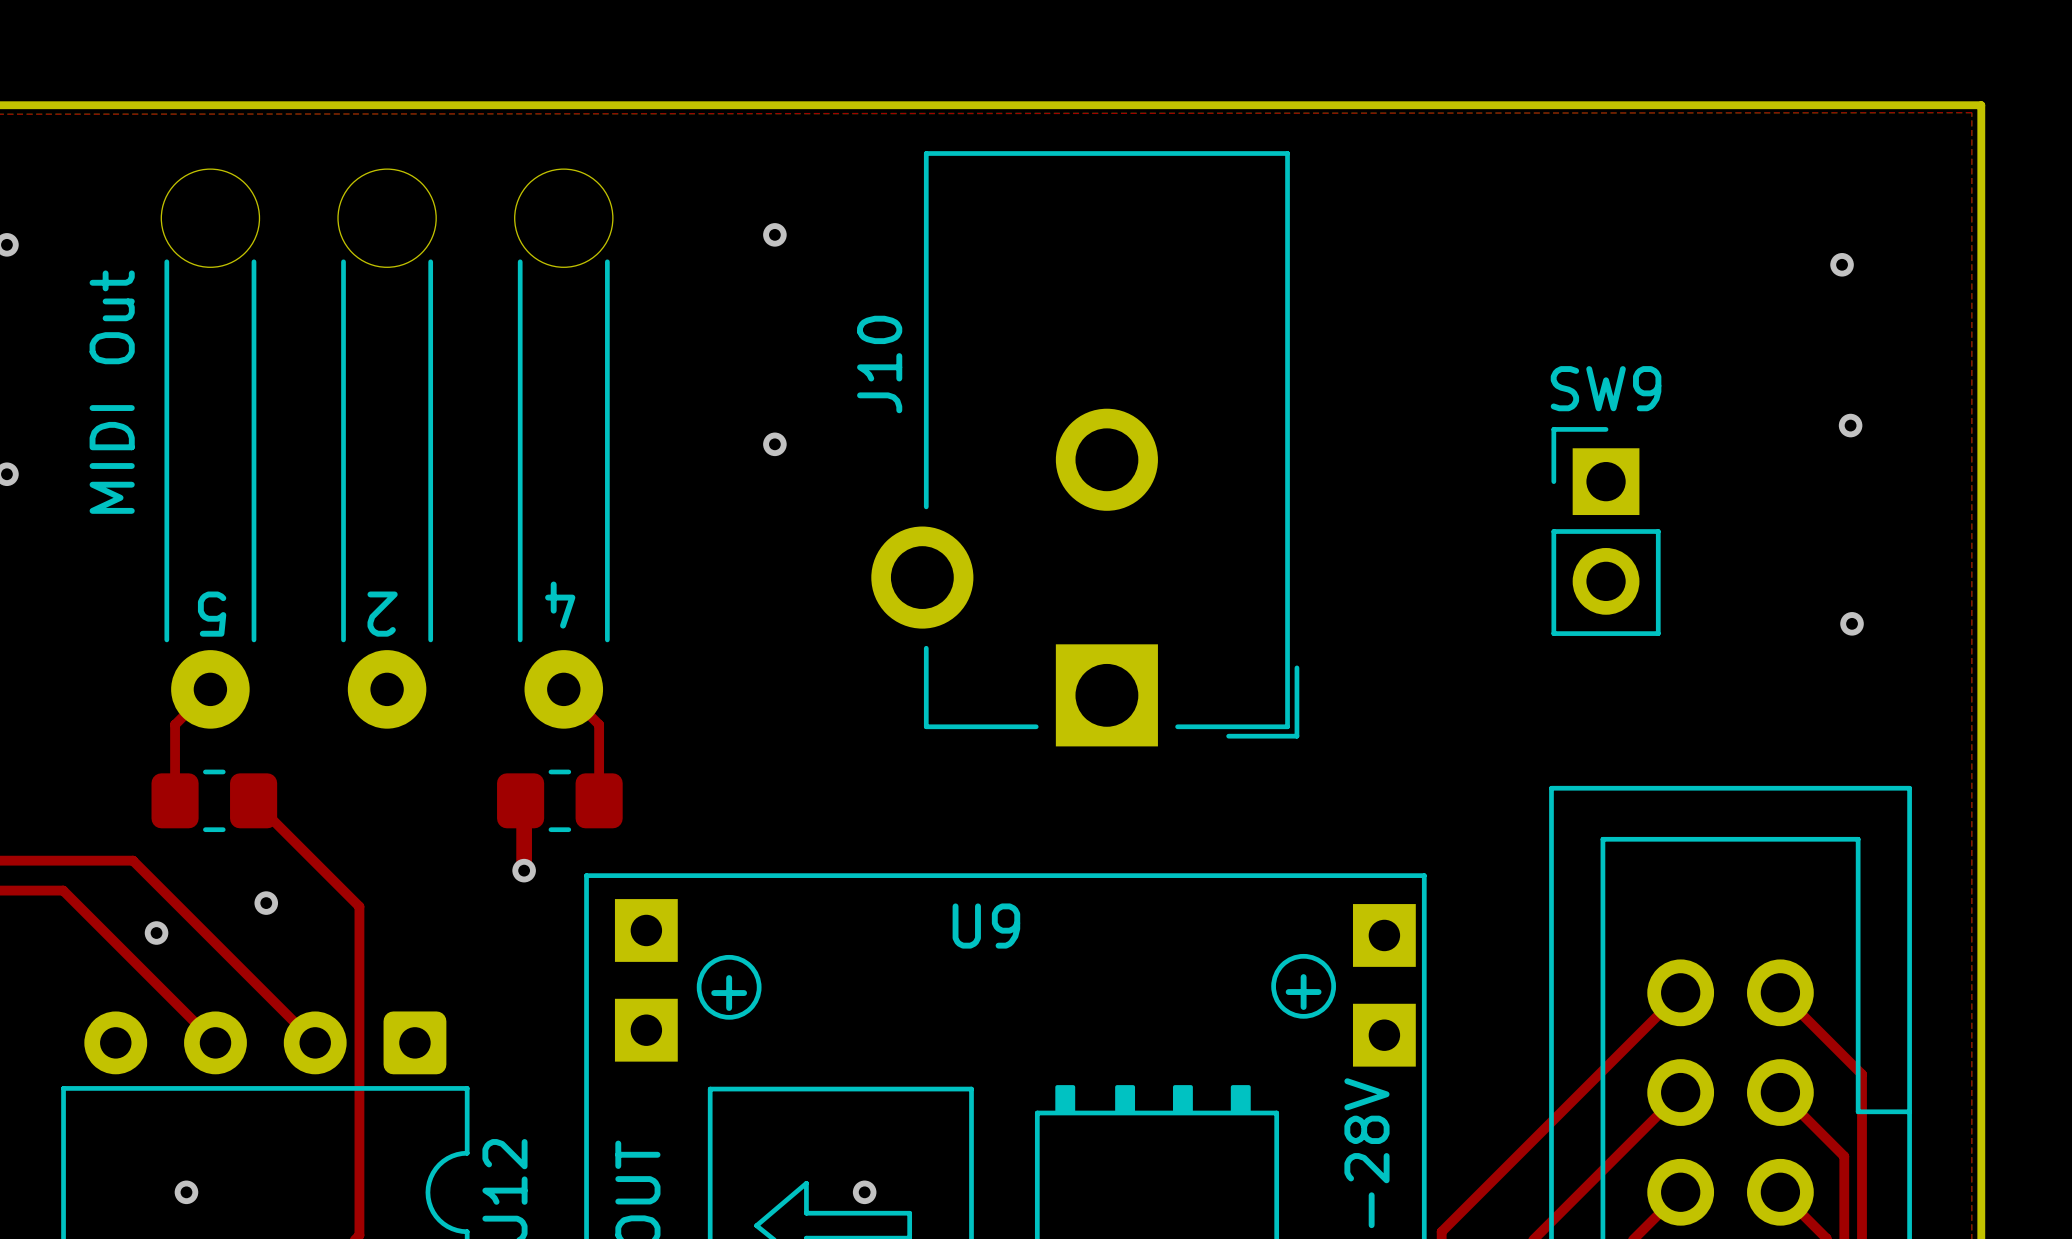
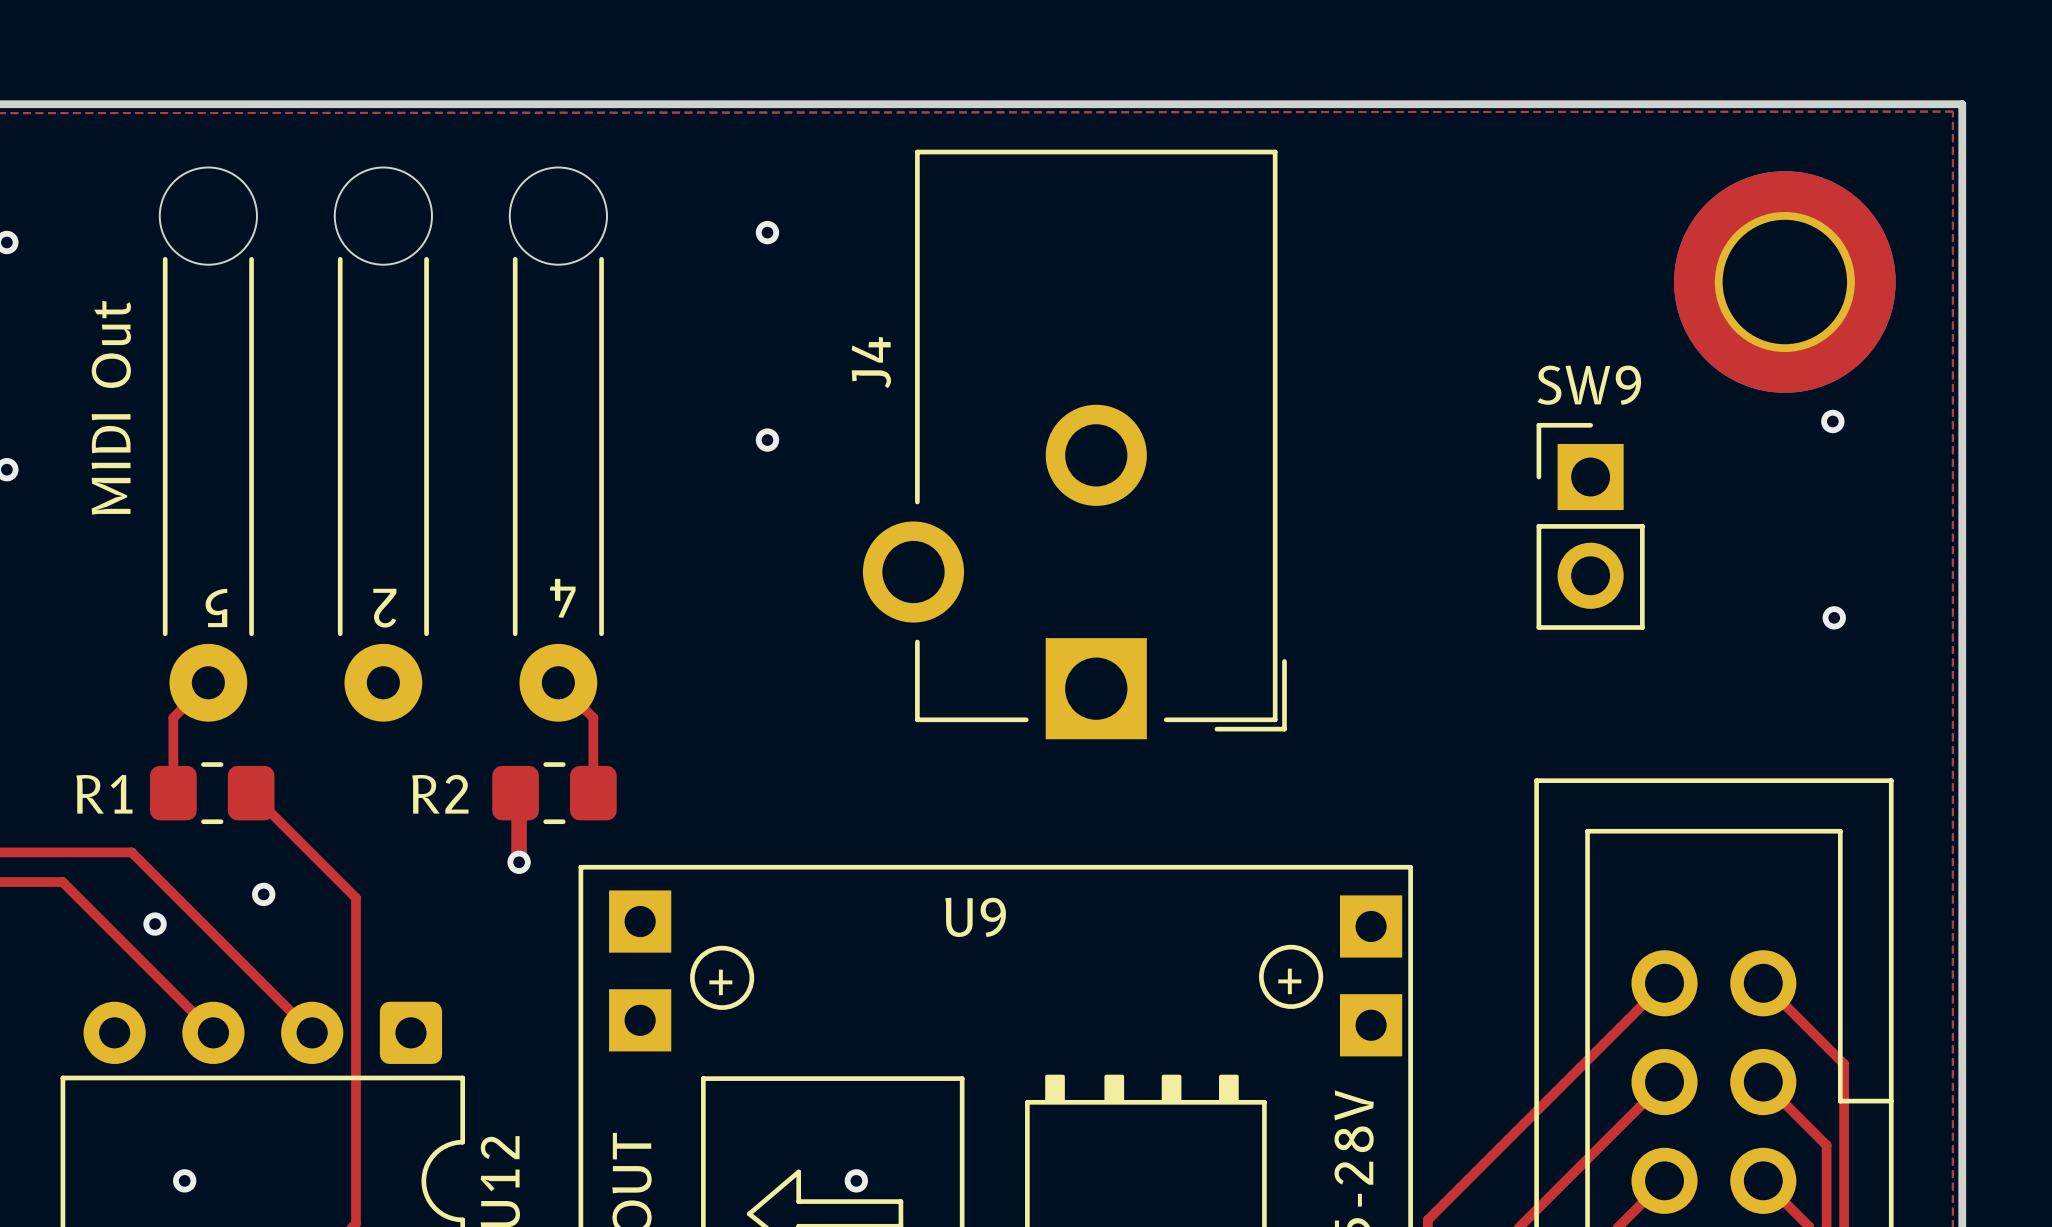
via: (1842, 264) -> none
part: none -> (1784, 282)
J10 name: J10 (879, 364) -> J4 (871, 362)
R1 name: none -> R1 (104, 794)
R2 name: none -> R2 (440, 794)

